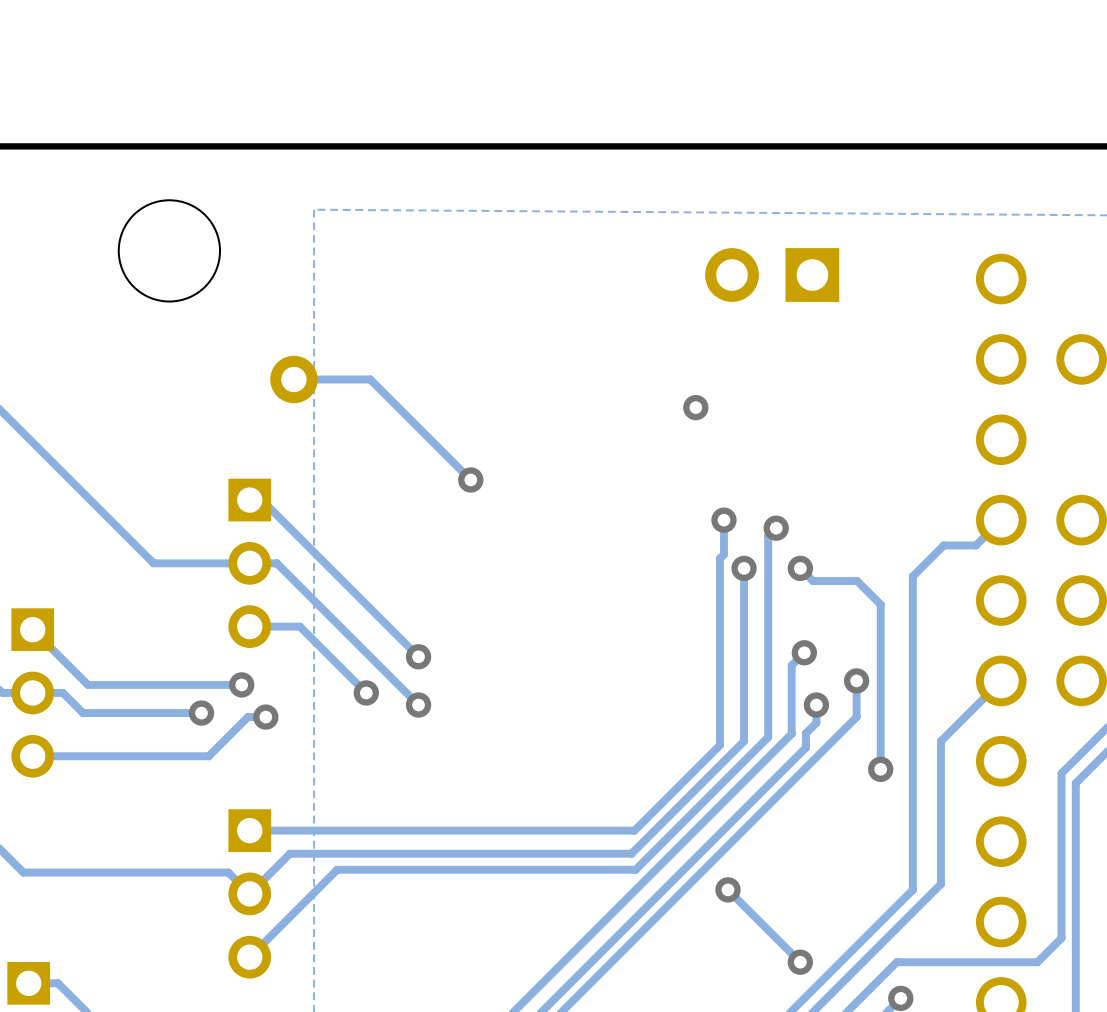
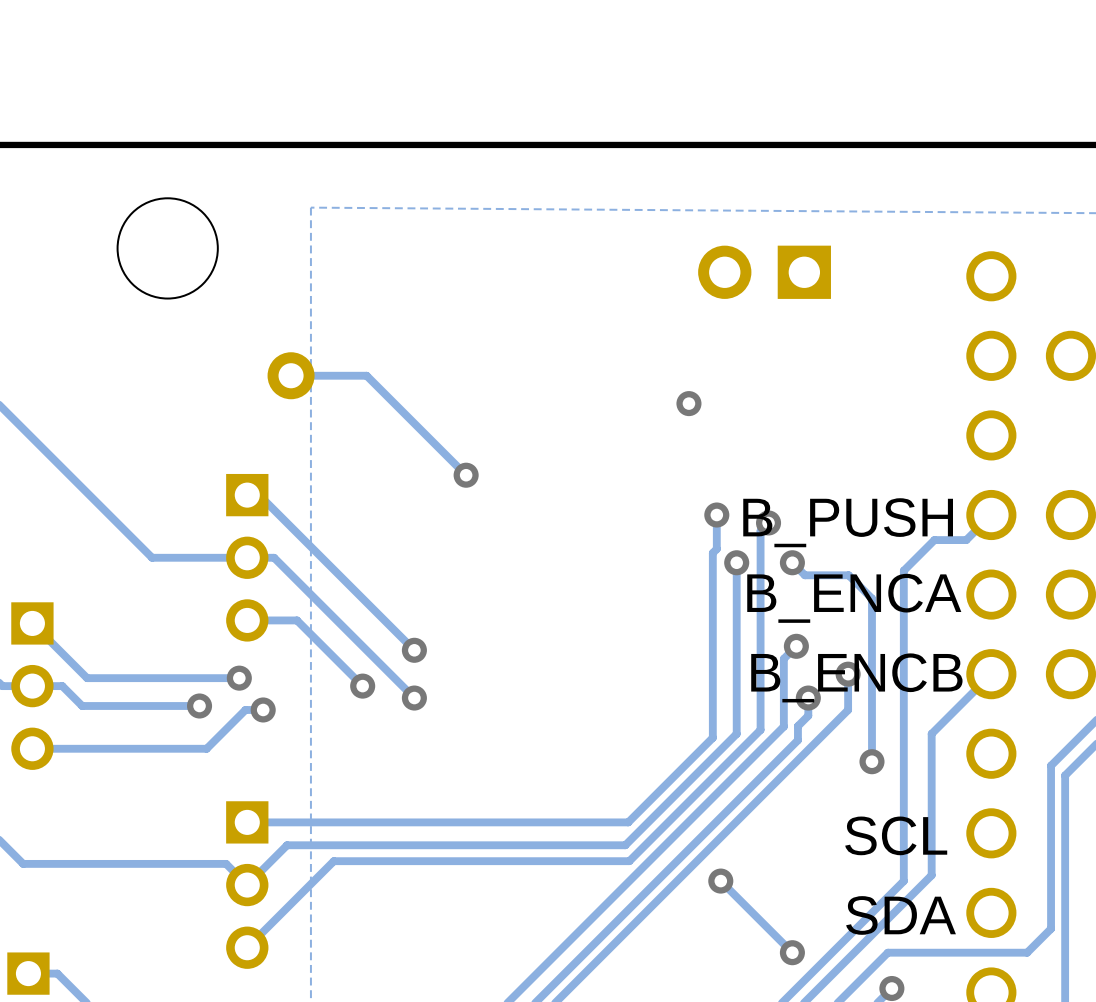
text: none -> B_PUSH (848, 522)
text: none -> B_ENCA (854, 598)
text: none -> B_ENCB (856, 677)
text: none -> SCL (896, 835)
text: none -> SDA (901, 915)

